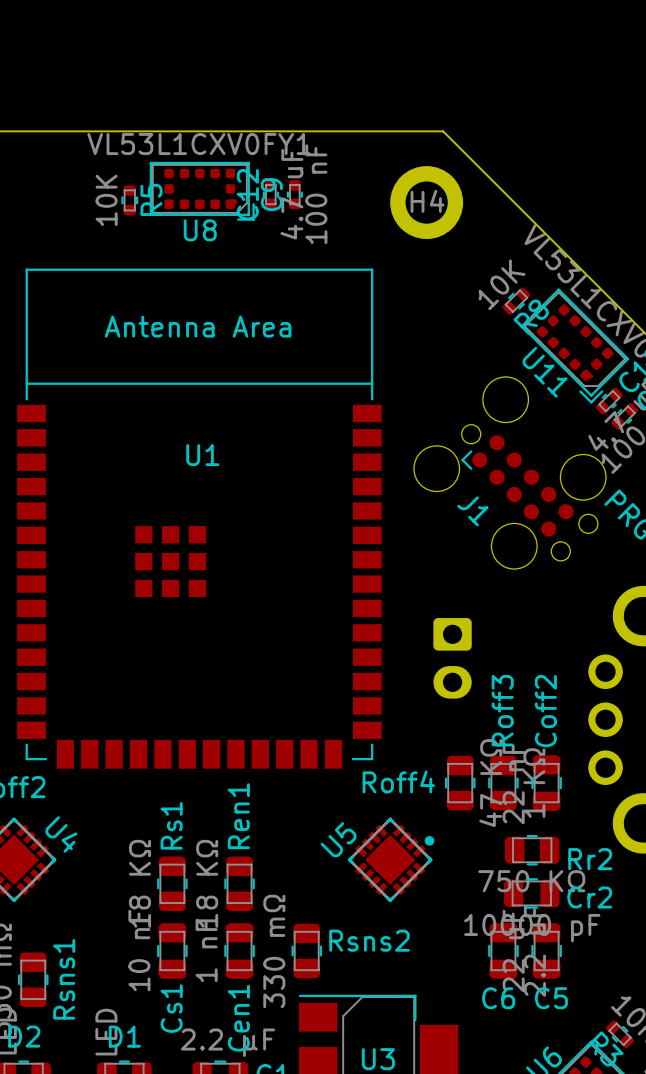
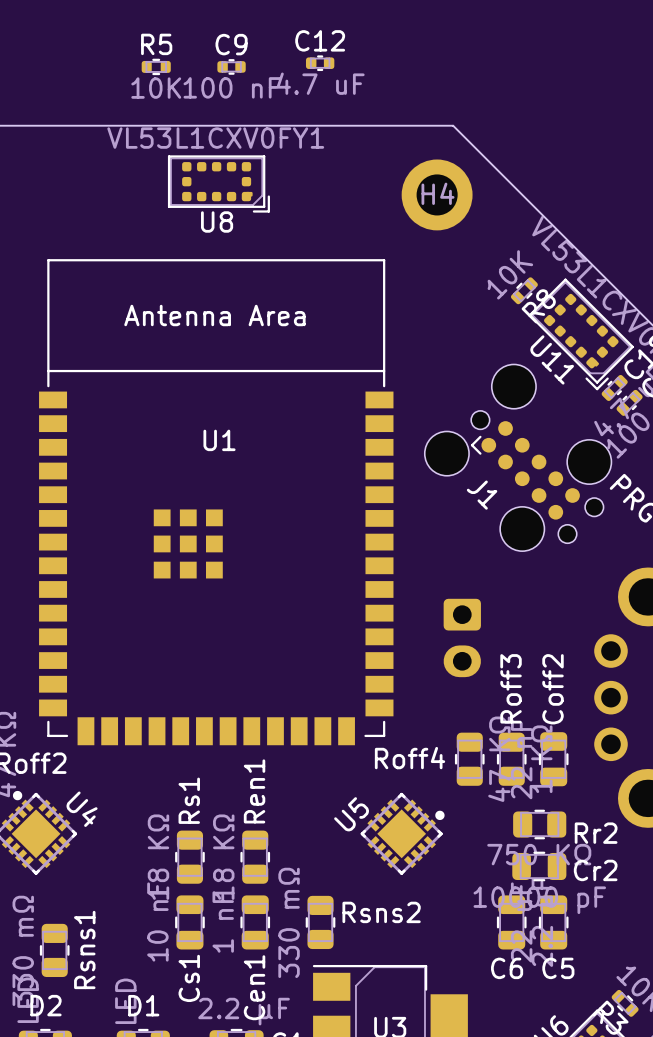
C12 rotation: 0° (270, 194) -> 90° clockwise (320, 63)
C12 position: (270, 194) -> (320, 63)
C9 rotation: 0° (294, 194) -> 90° clockwise (231, 66)
C9 position: (294, 194) -> (231, 66)
R5 rotation: 0° (129, 200) -> 90° clockwise (156, 66)
R5 position: (129, 200) -> (156, 66)

